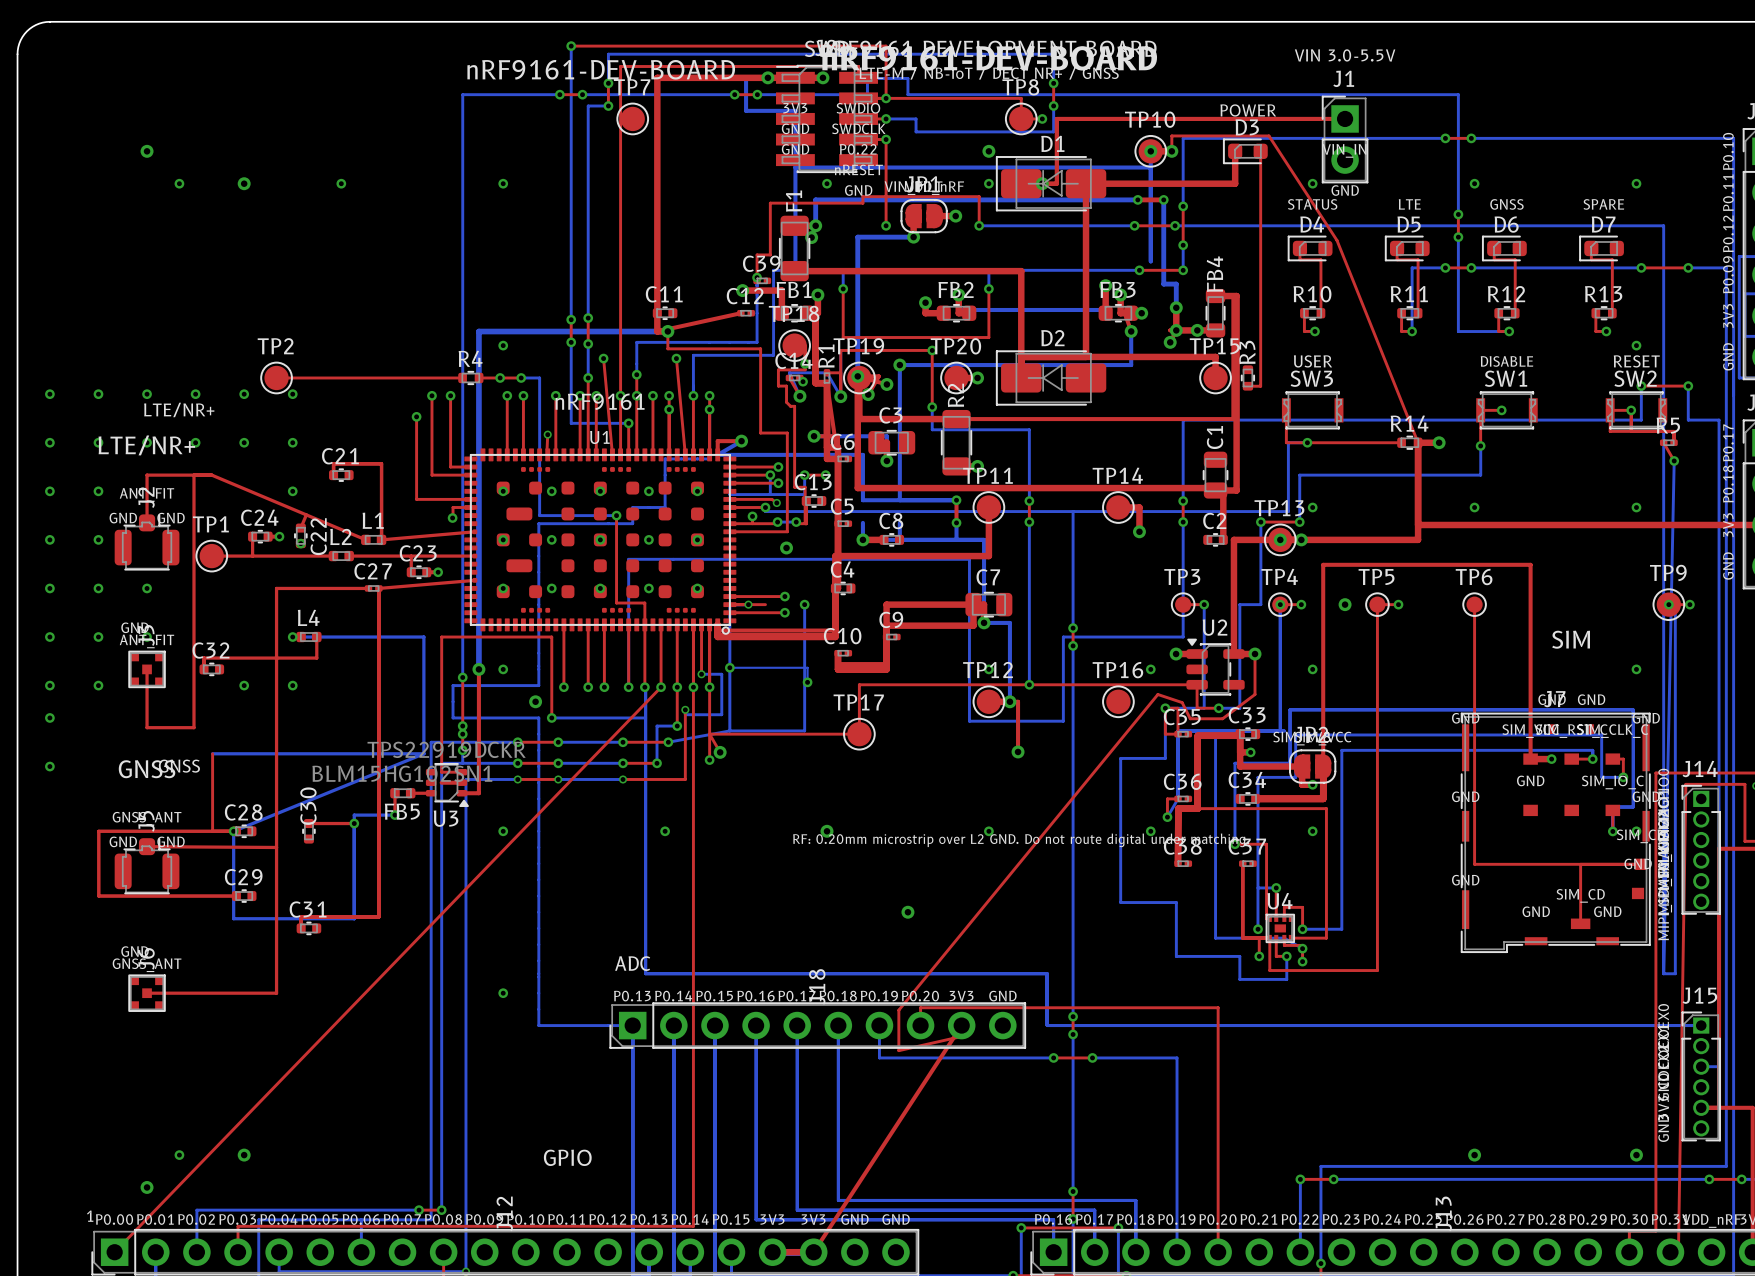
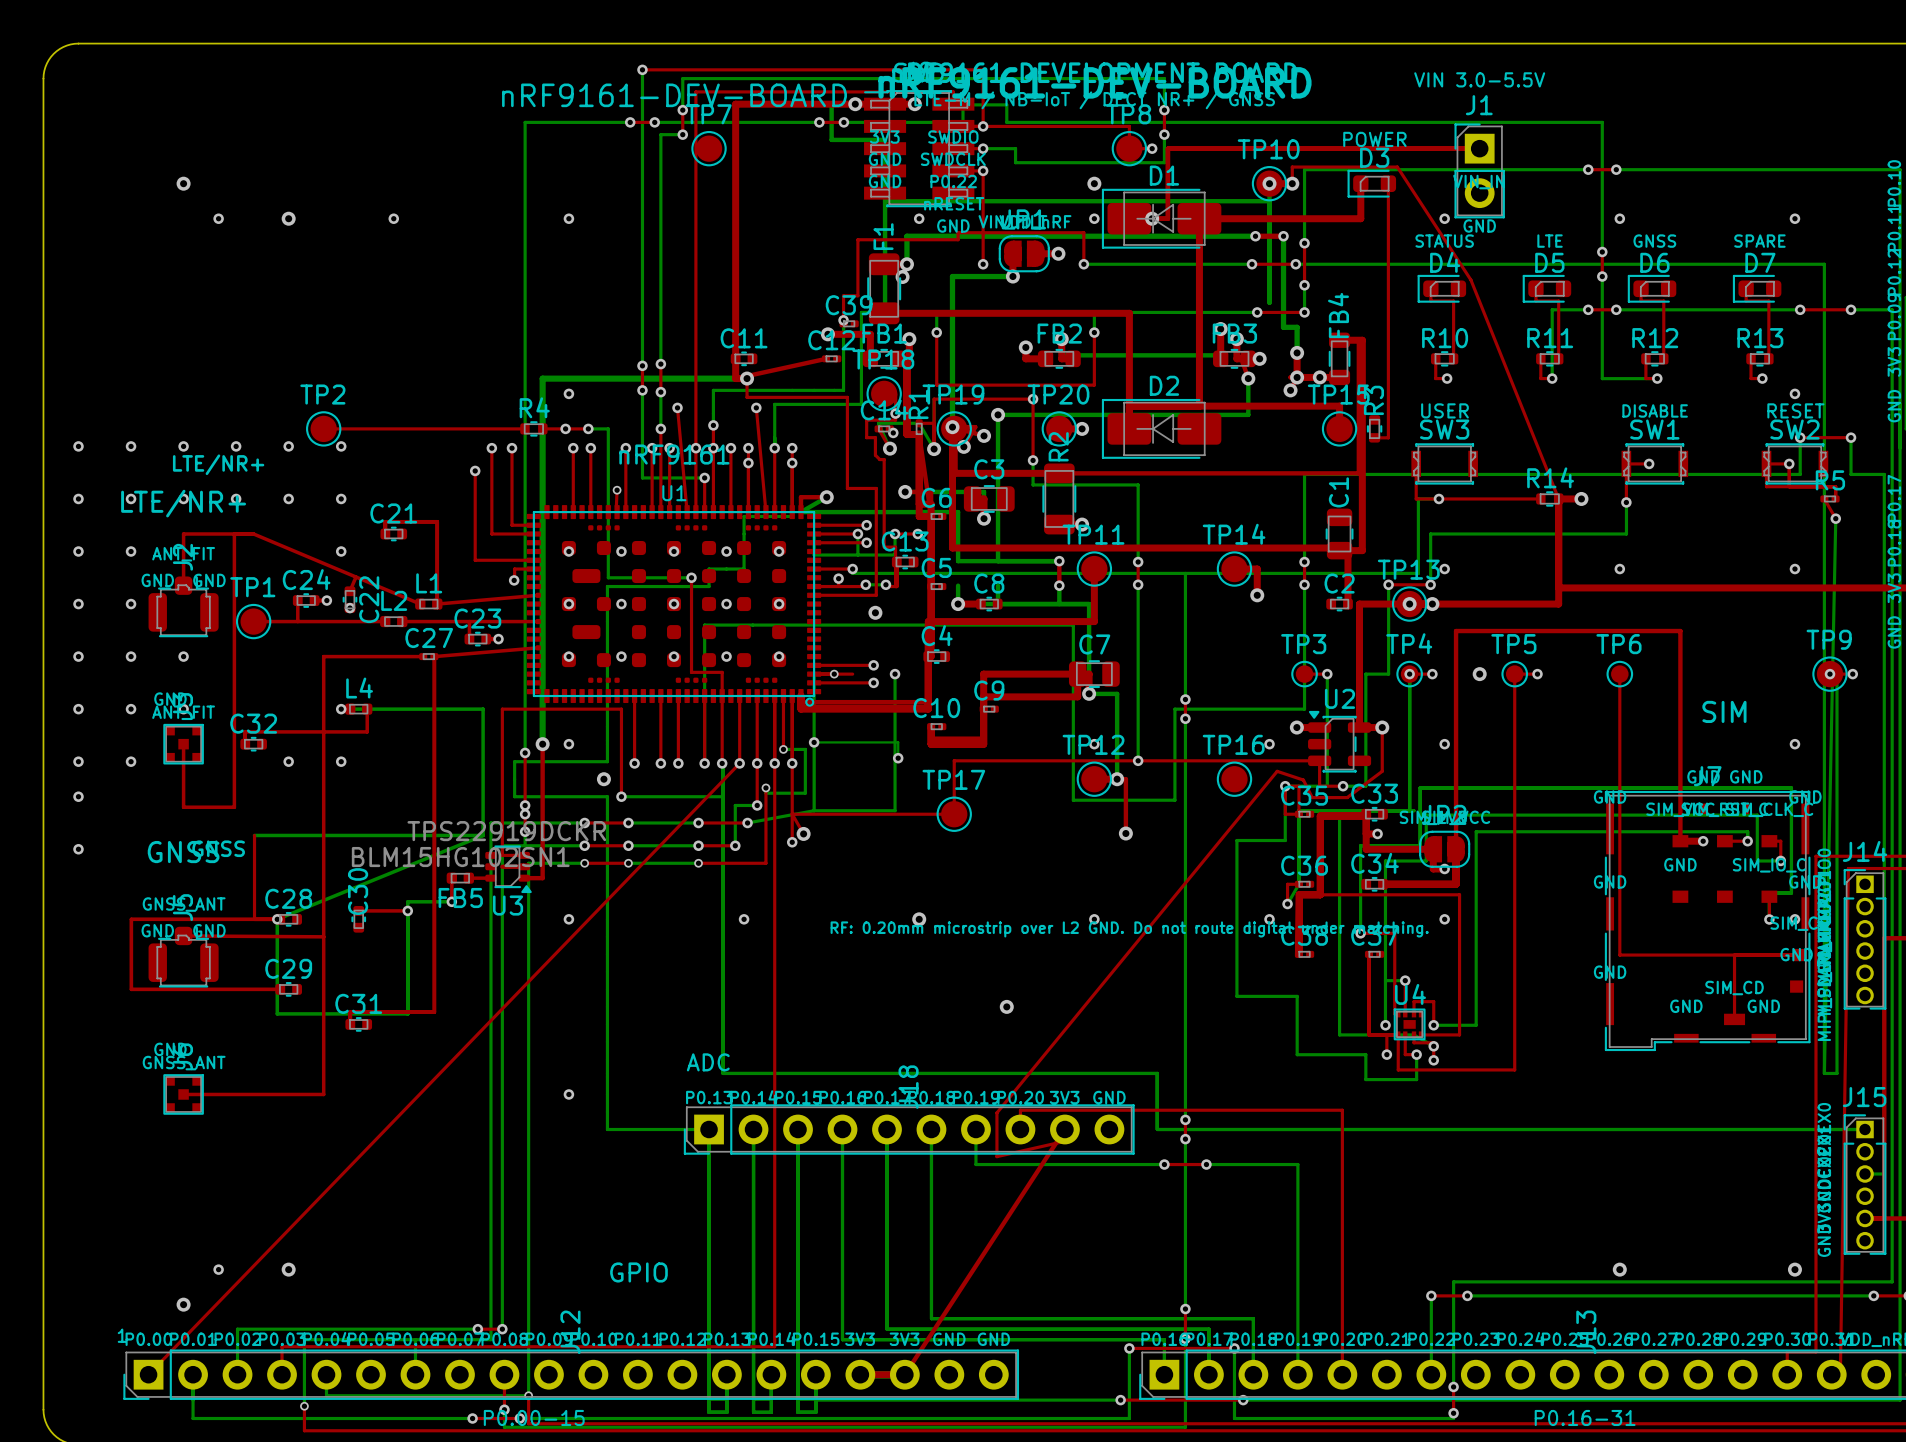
top track: (729, 499) (771, 499) (776, 502) -> none
via: (776, 502) -> none

